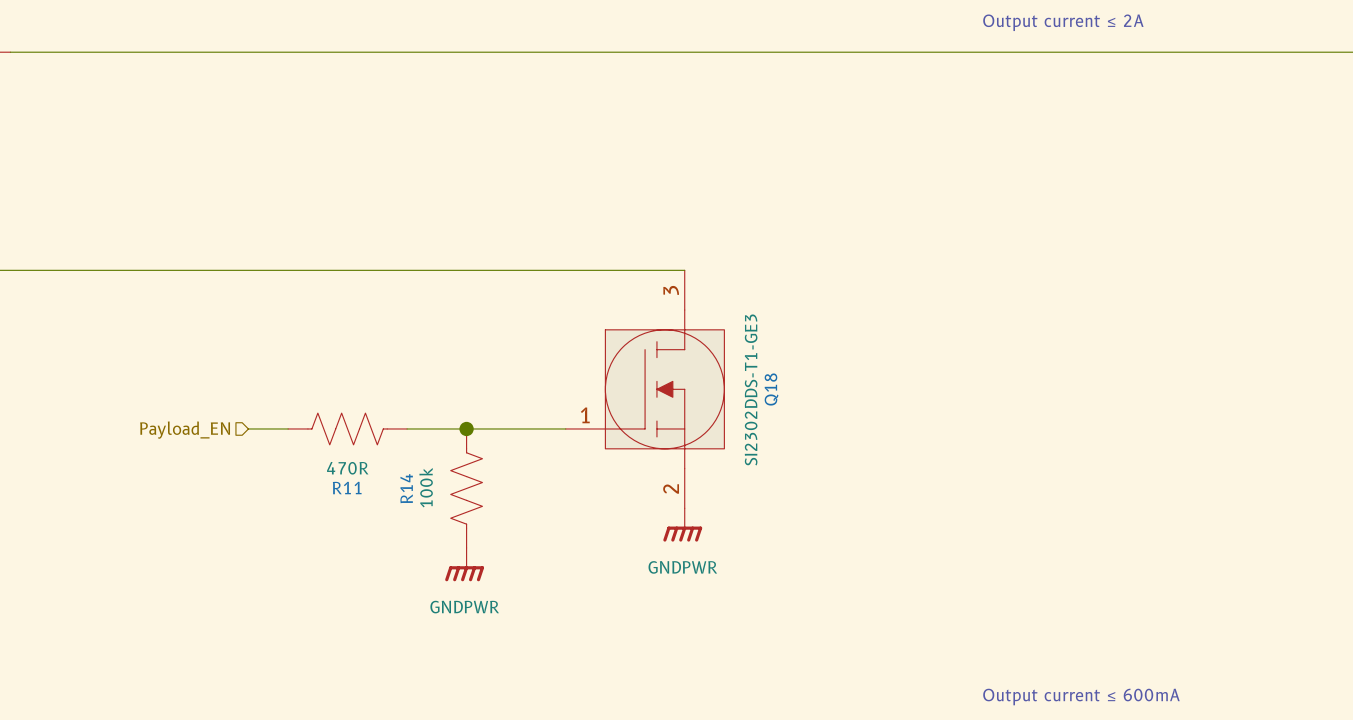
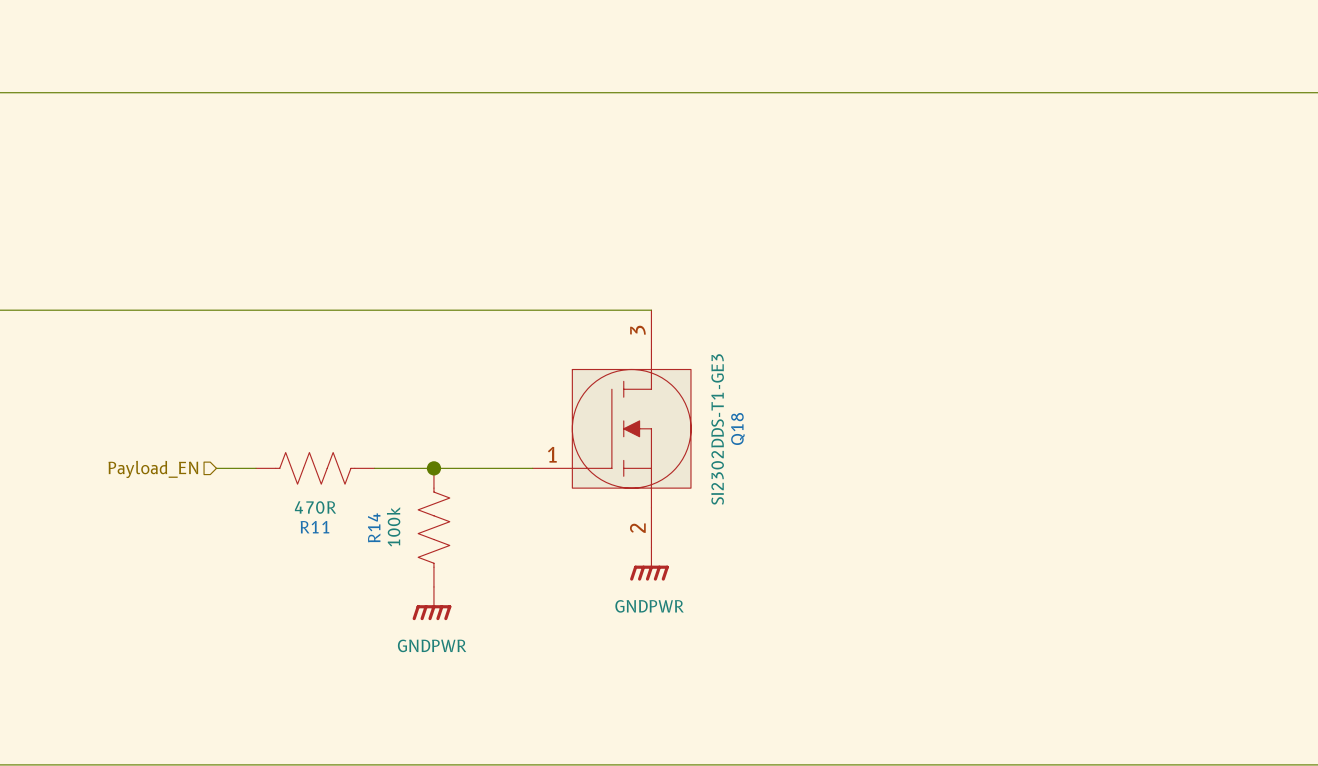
text: Output current ≤ 2A (1063, 22) -> none
text: Output current ≤ 600mA (1081, 696) -> none

